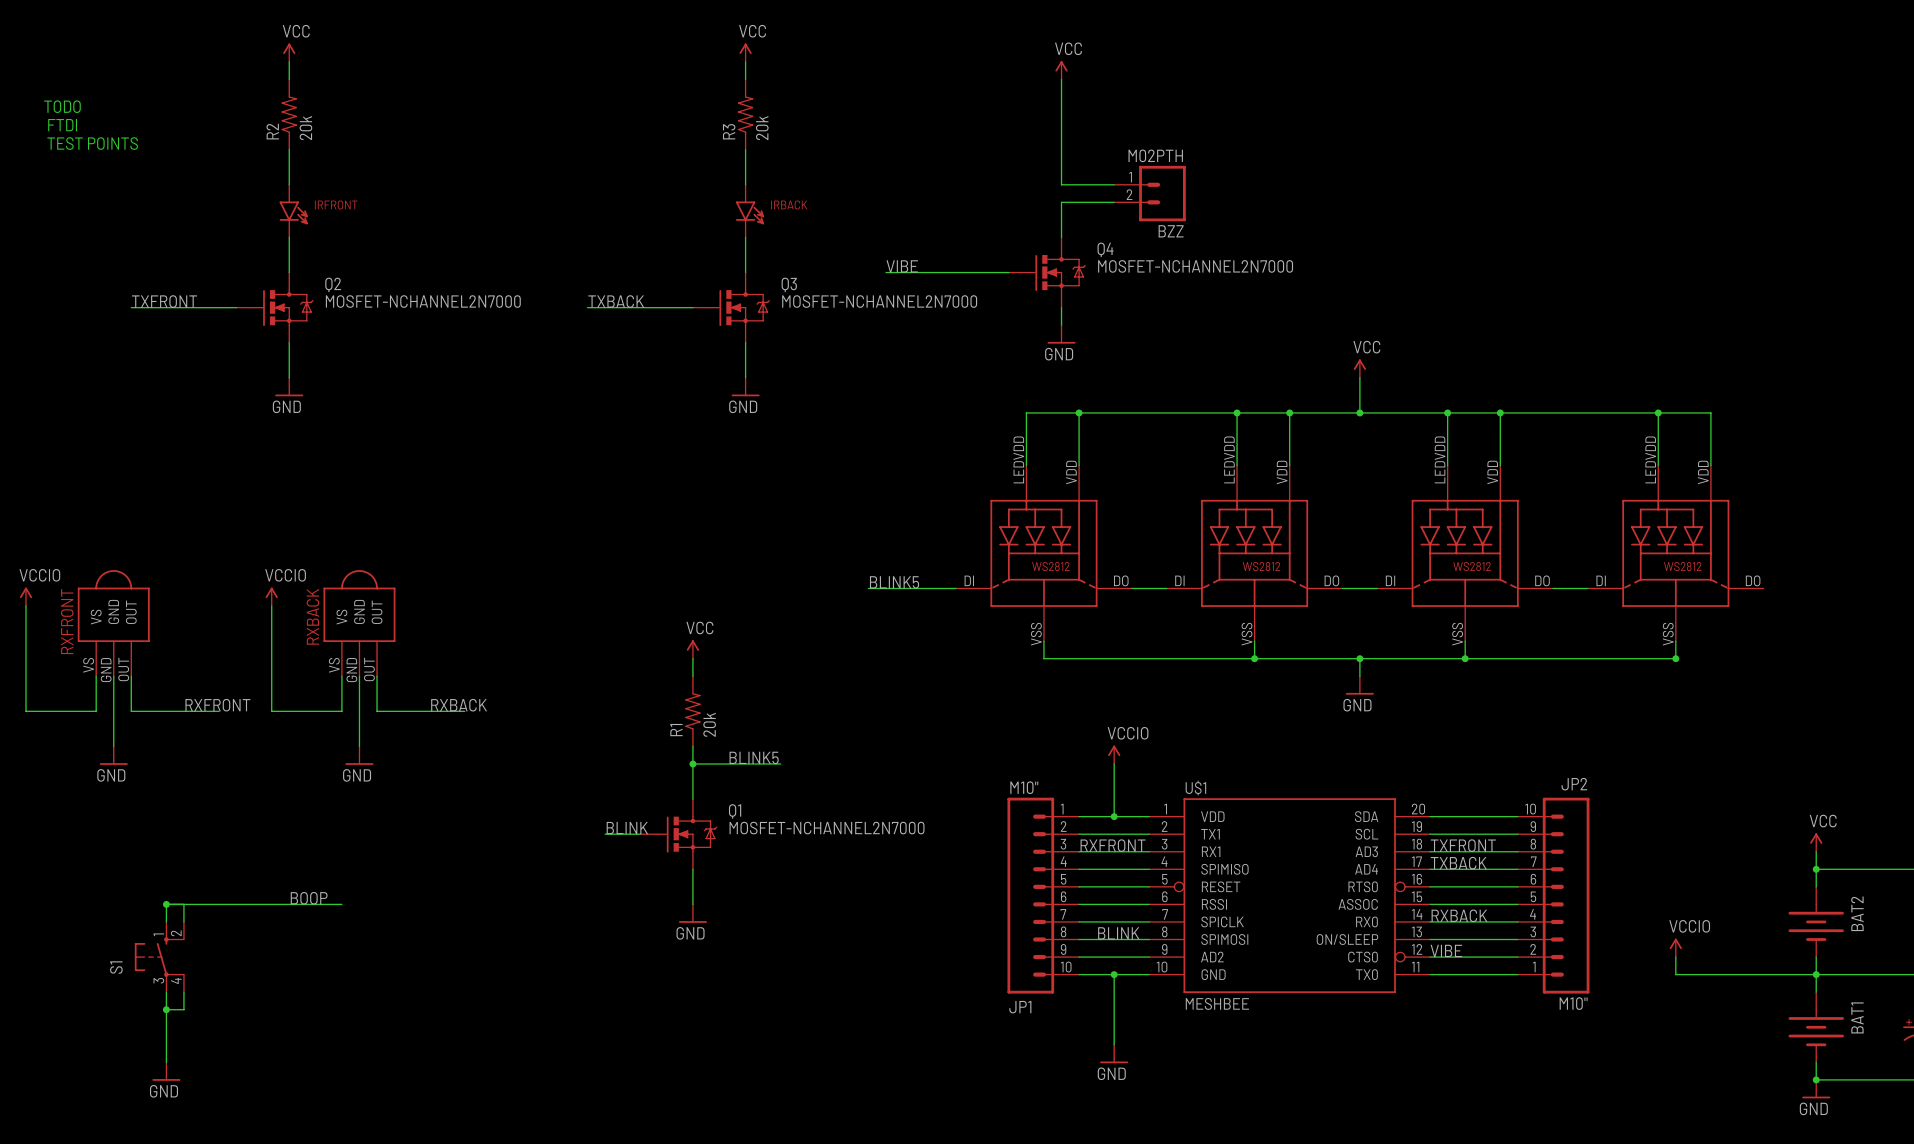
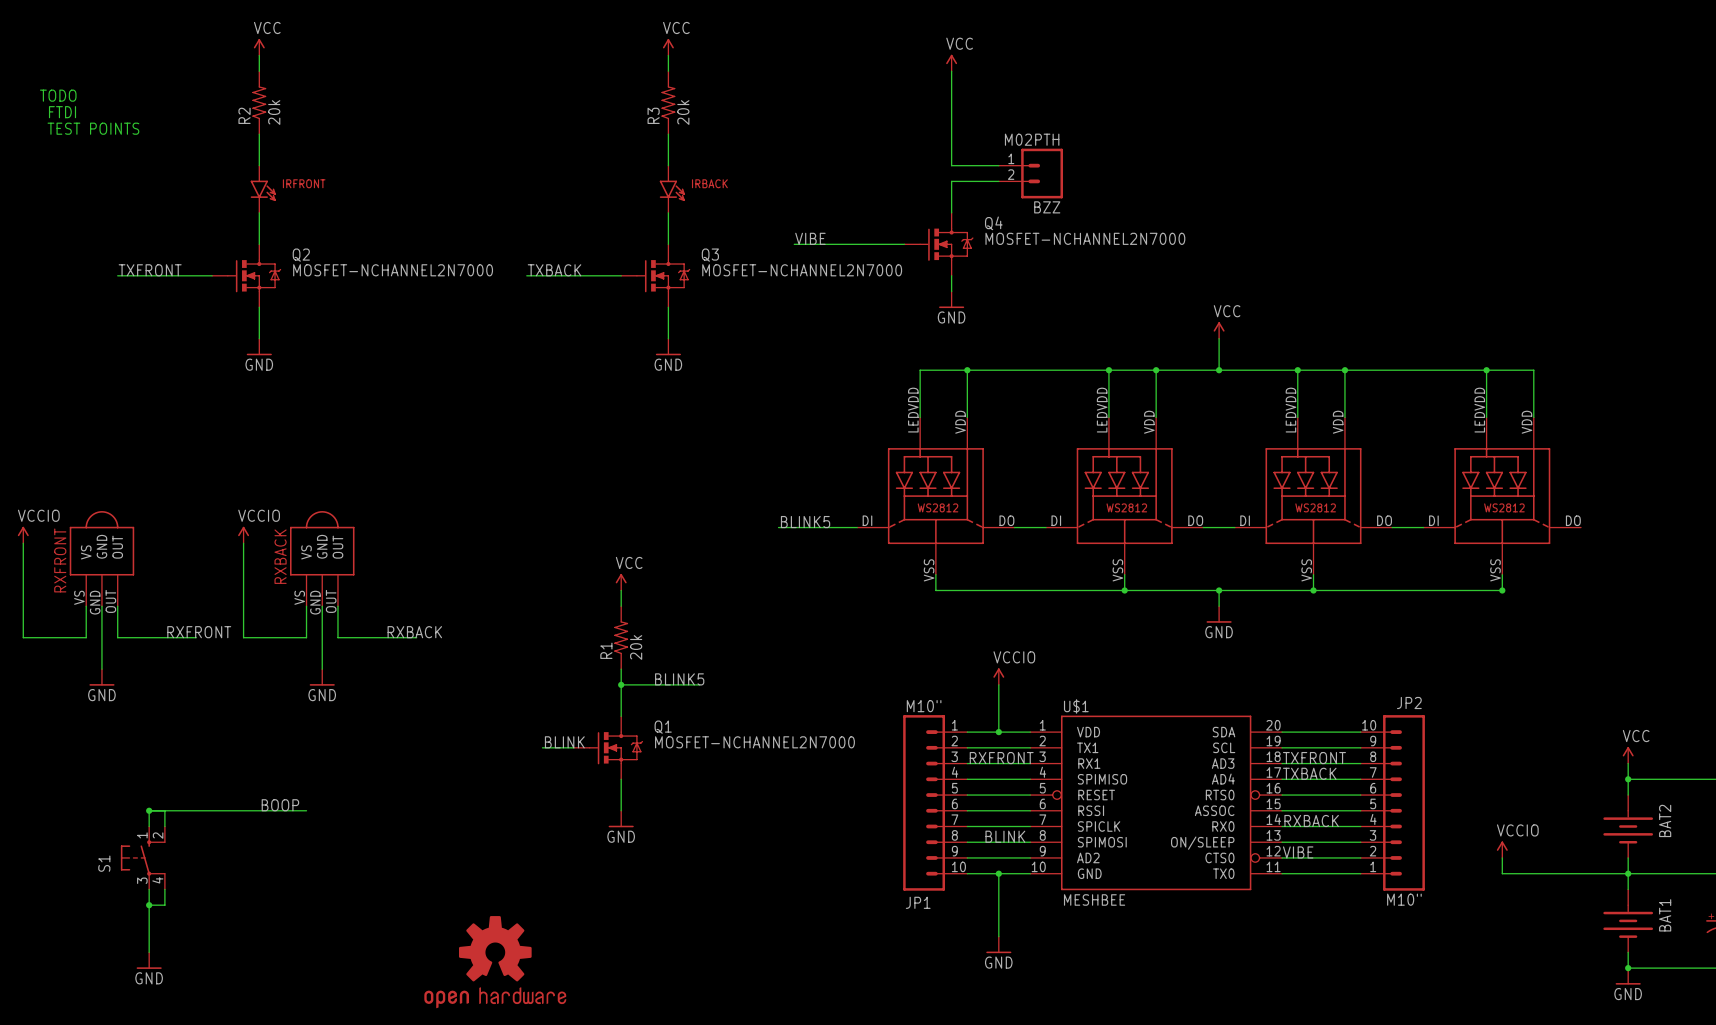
part: none -> (495, 962)

